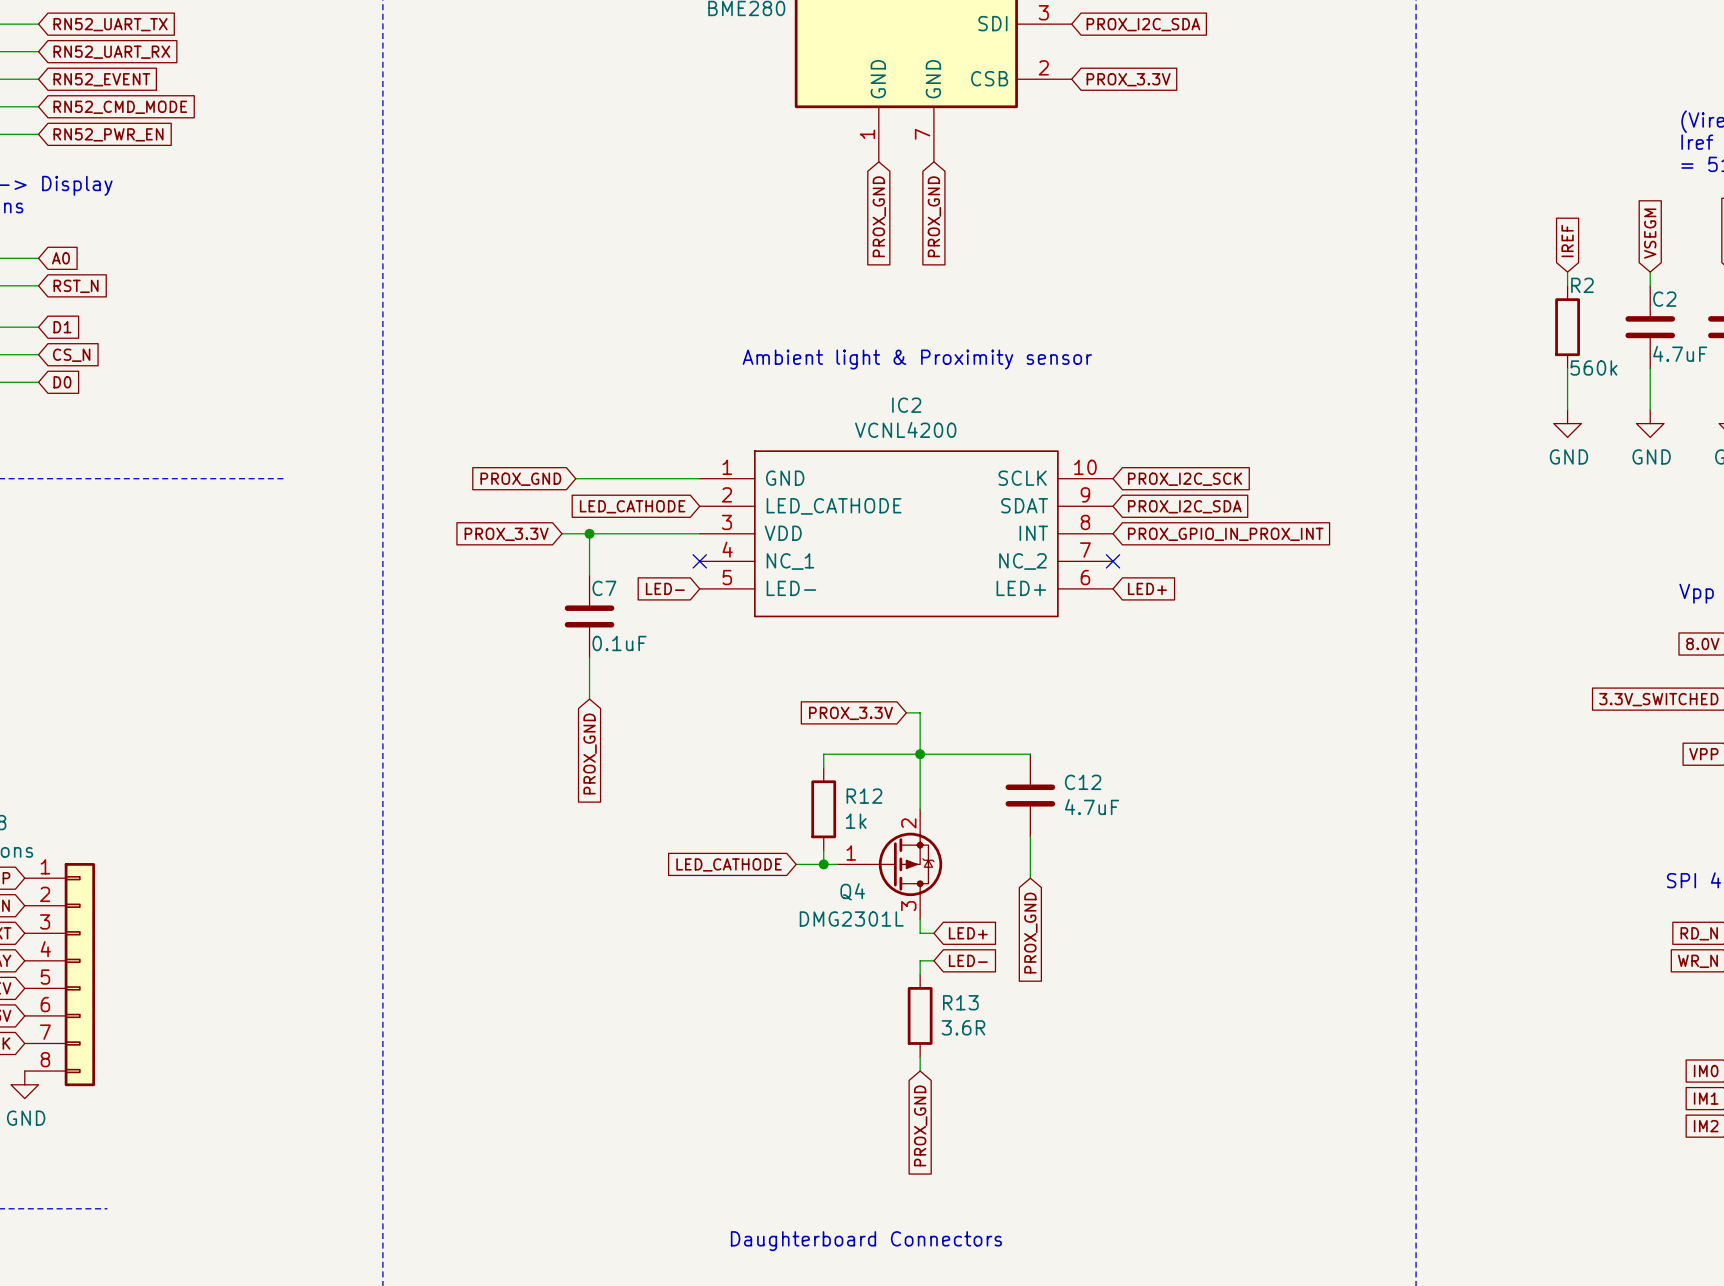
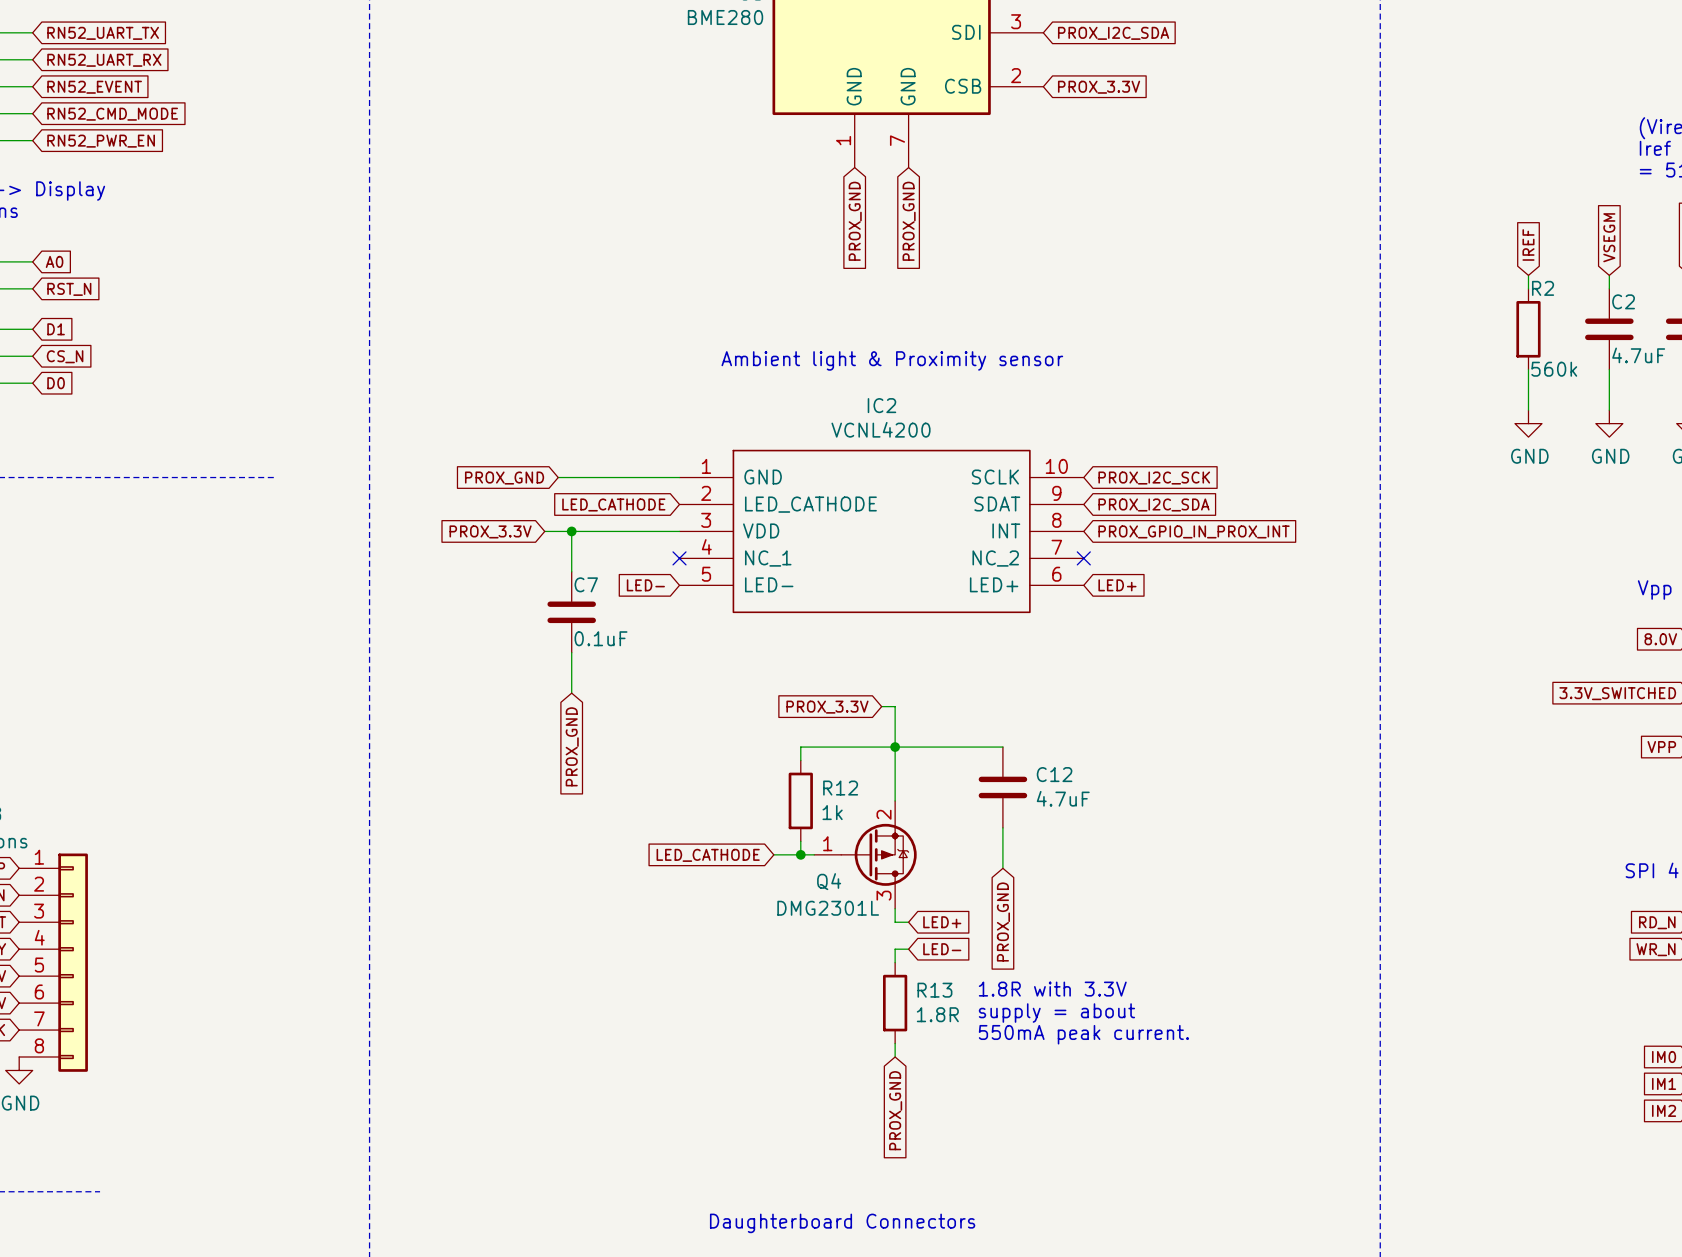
text: none -> 1.8R with 3.3V (1052, 989)
text: none -> supply = about (1056, 1013)
R13 value: 3.6R (963, 1027) -> 1.8R (937, 1014)
text: none -> 550mA peak current. (1083, 1034)

